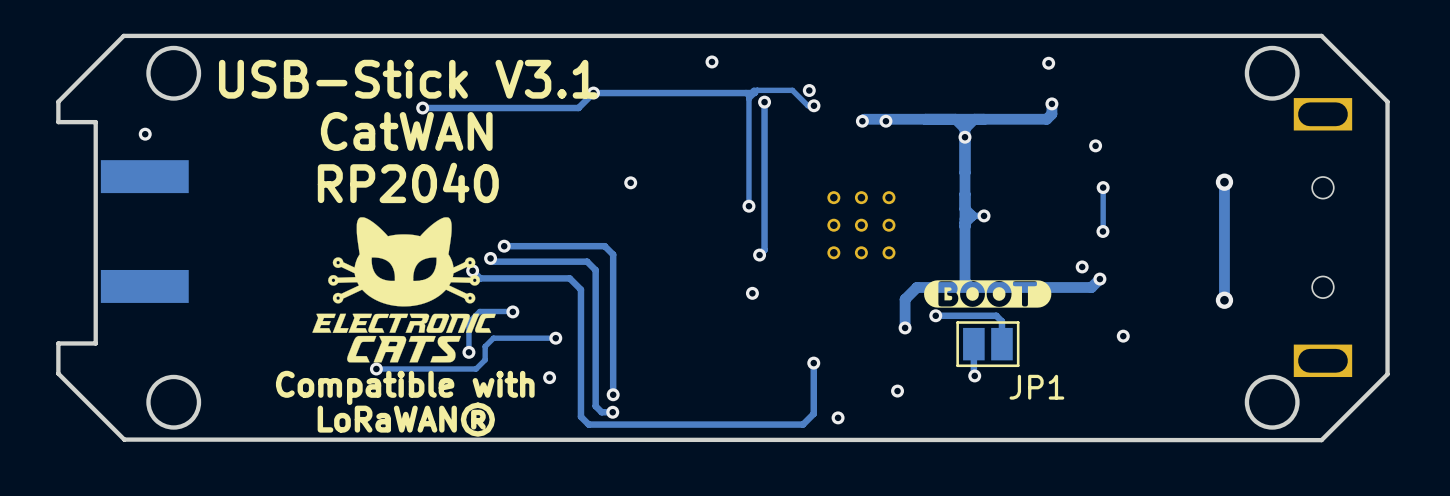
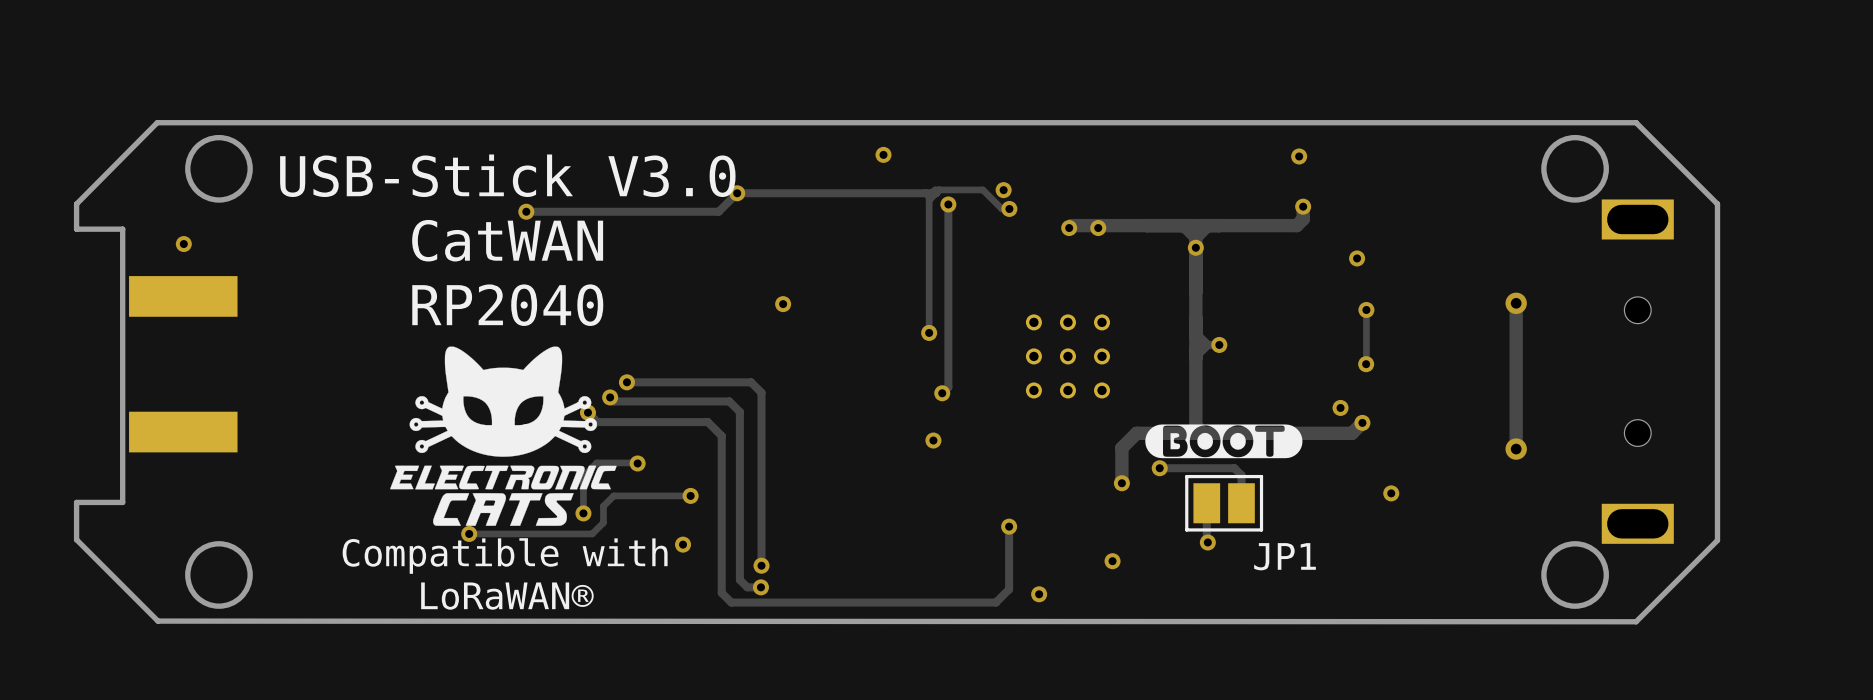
text: USB-Stick V3.1 (408, 79) -> USB-Stick V3.0 (507, 175)

